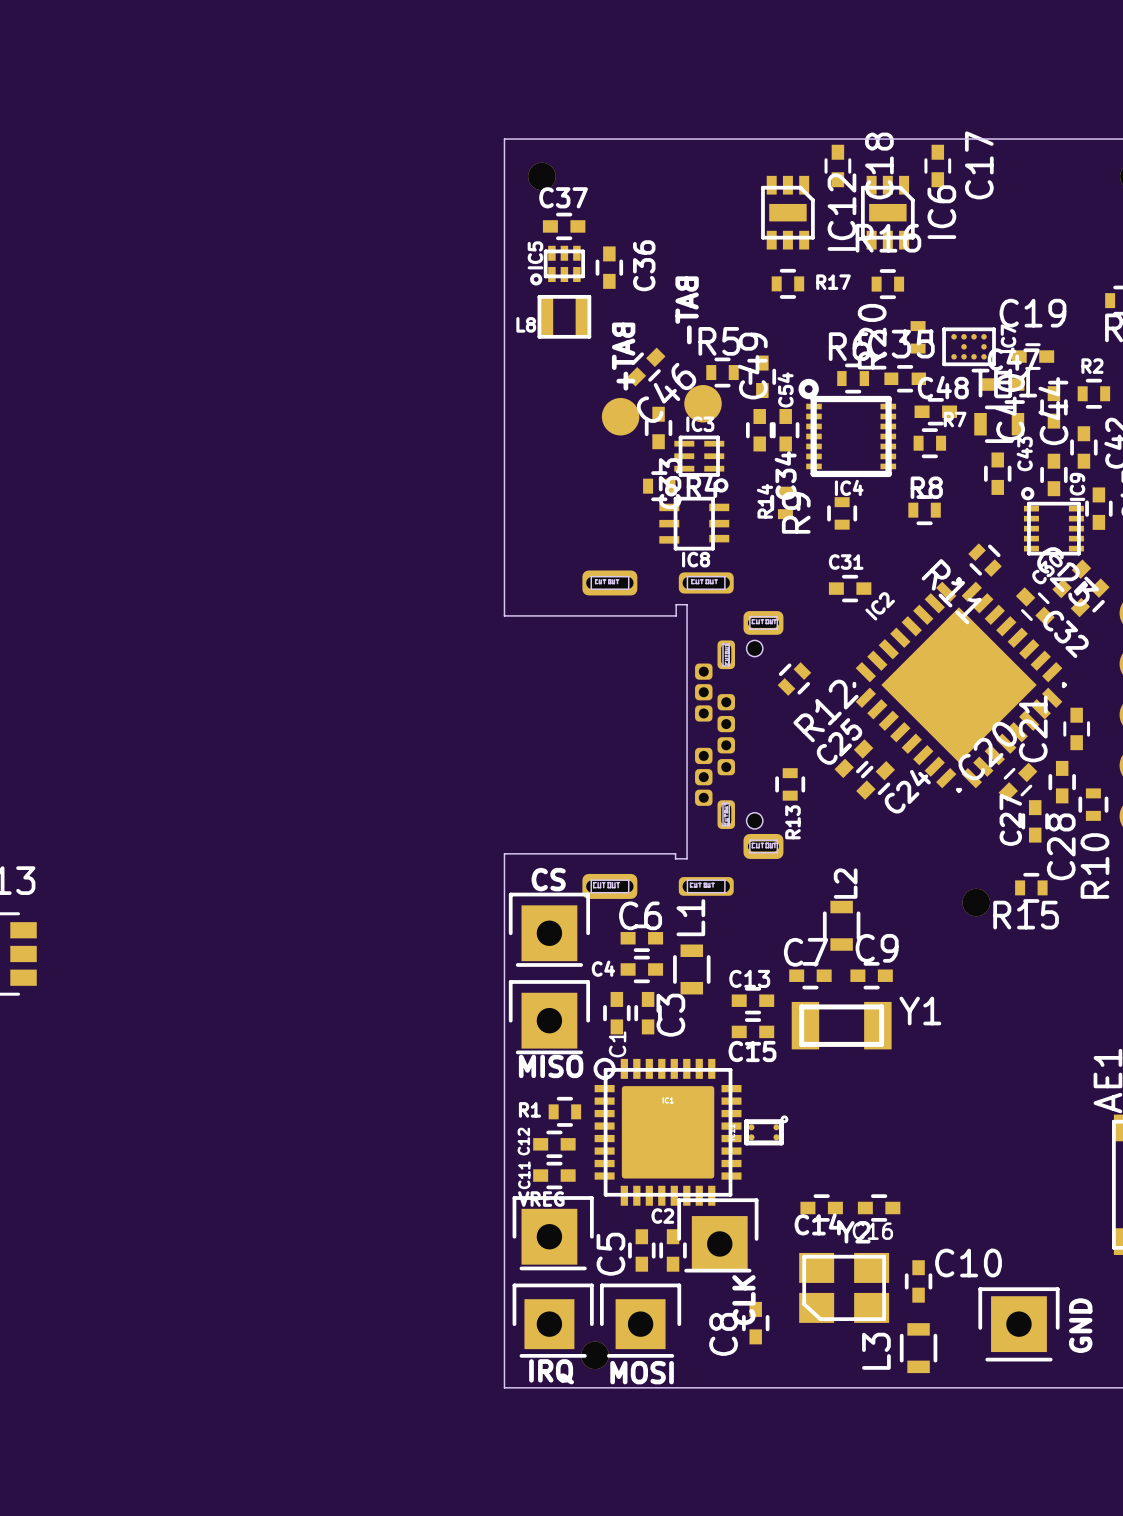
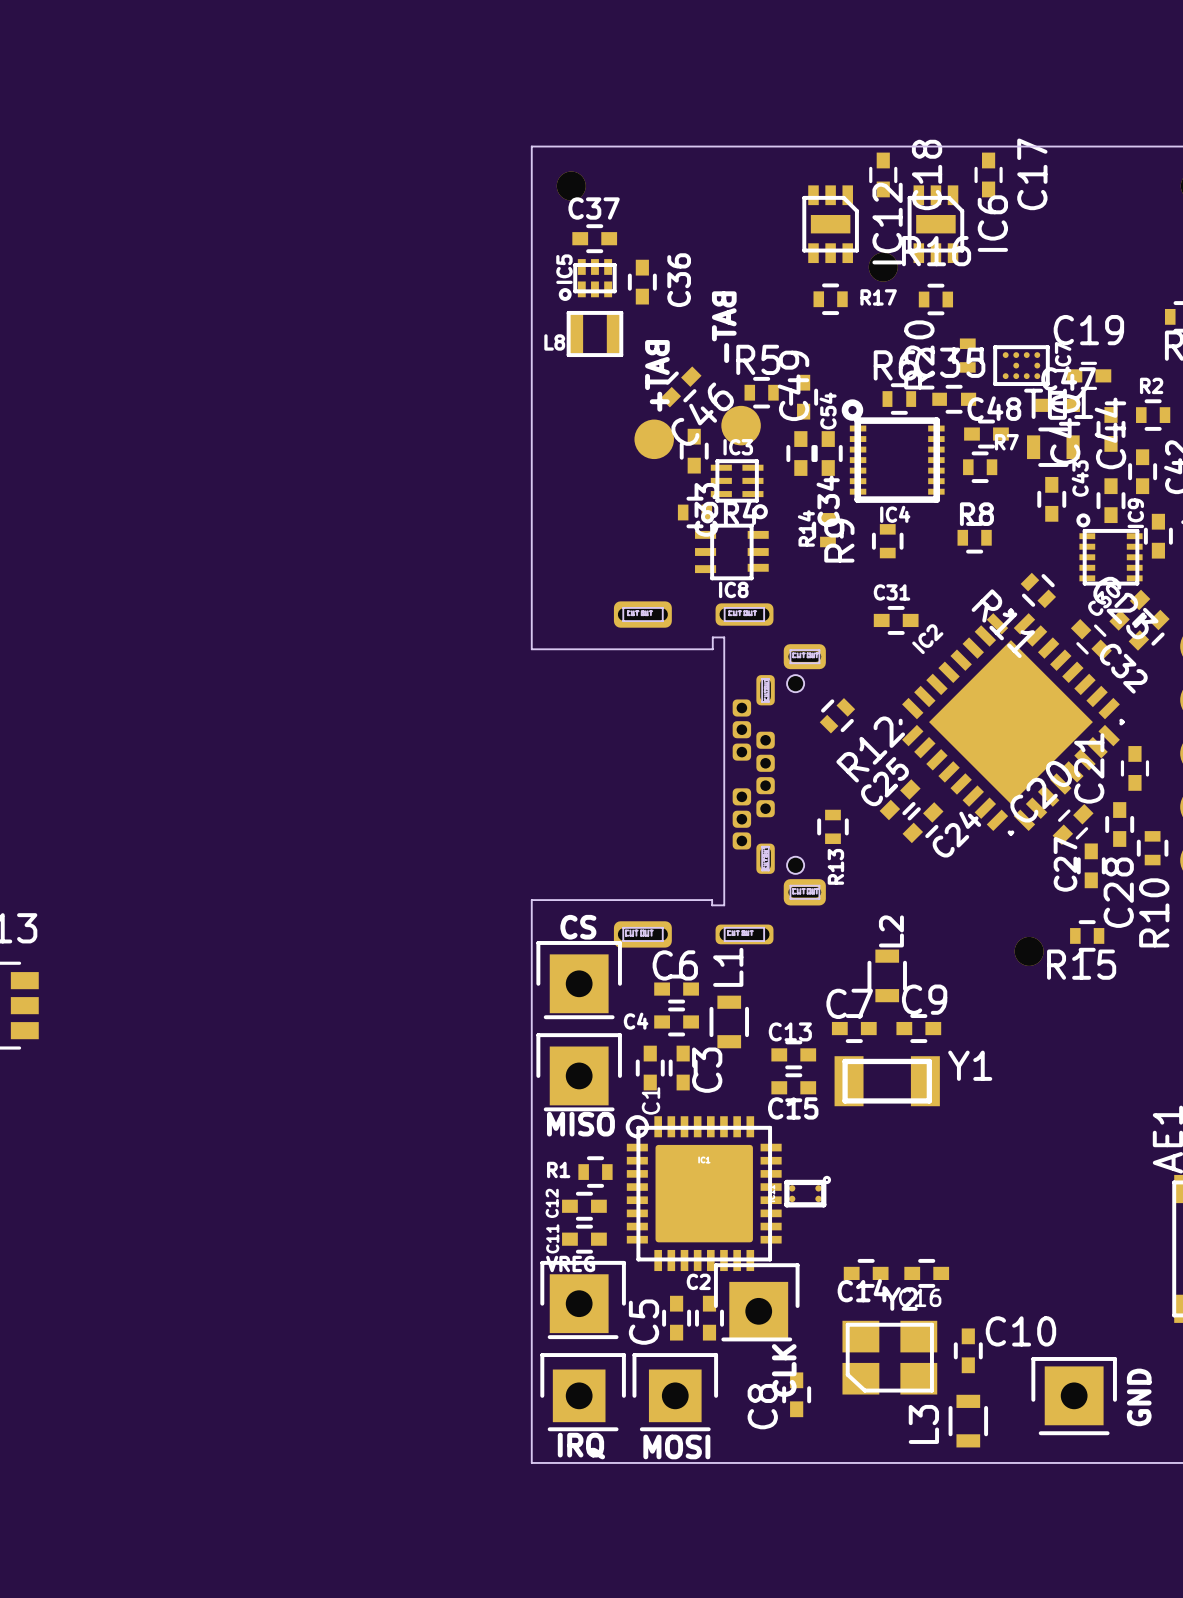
part: none -> (883, 267)
part: (595, 1355) -> none

